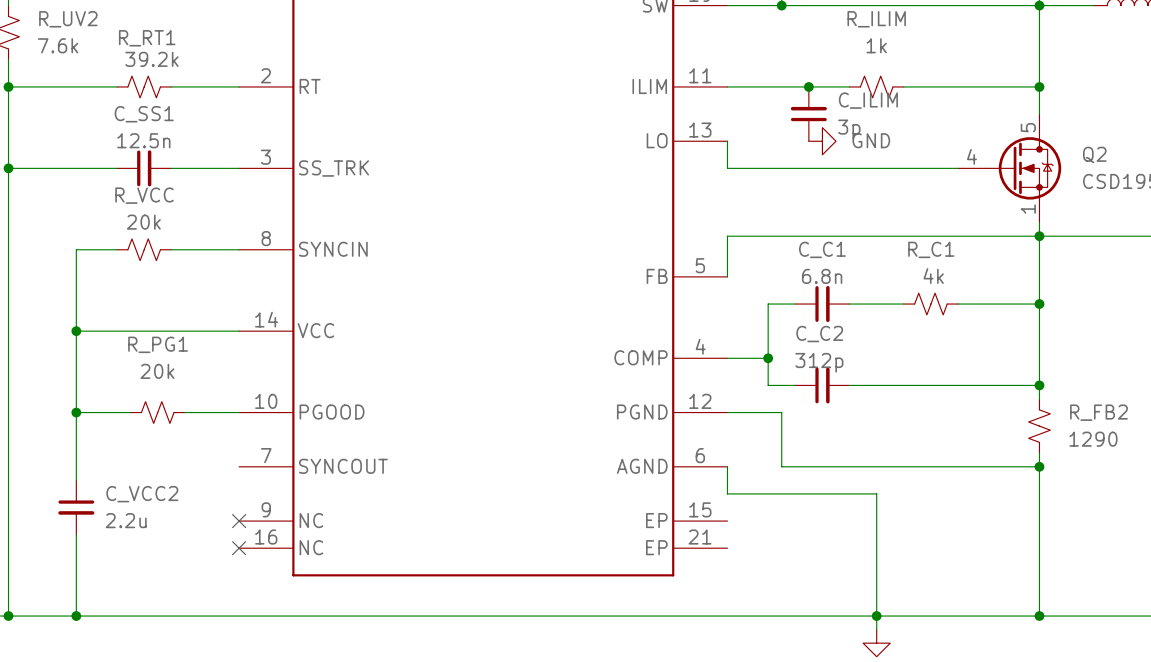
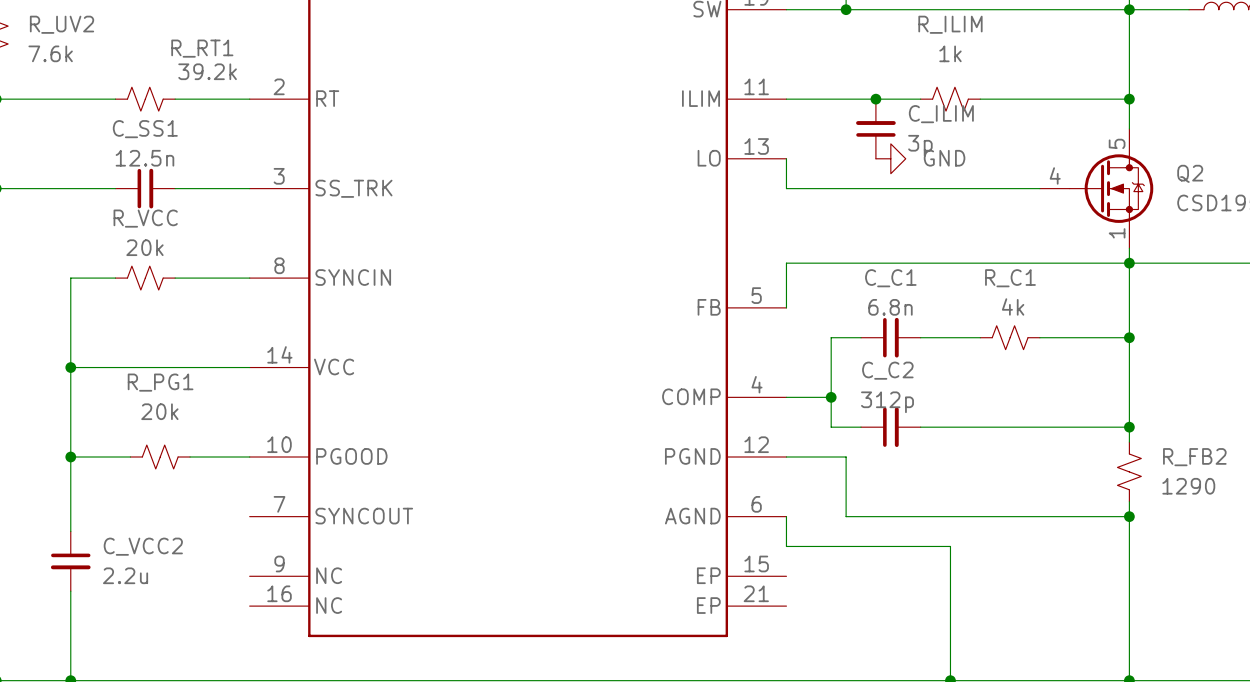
R_RT1 name position: R_RT1 (147, 38) -> R_RT1 (202, 48)
R_RT1 value position: 39.2k (151, 59) -> 39.2k (207, 71)
no-connect mark: (239, 521) -> none
no-connect mark: (239, 548) -> none

